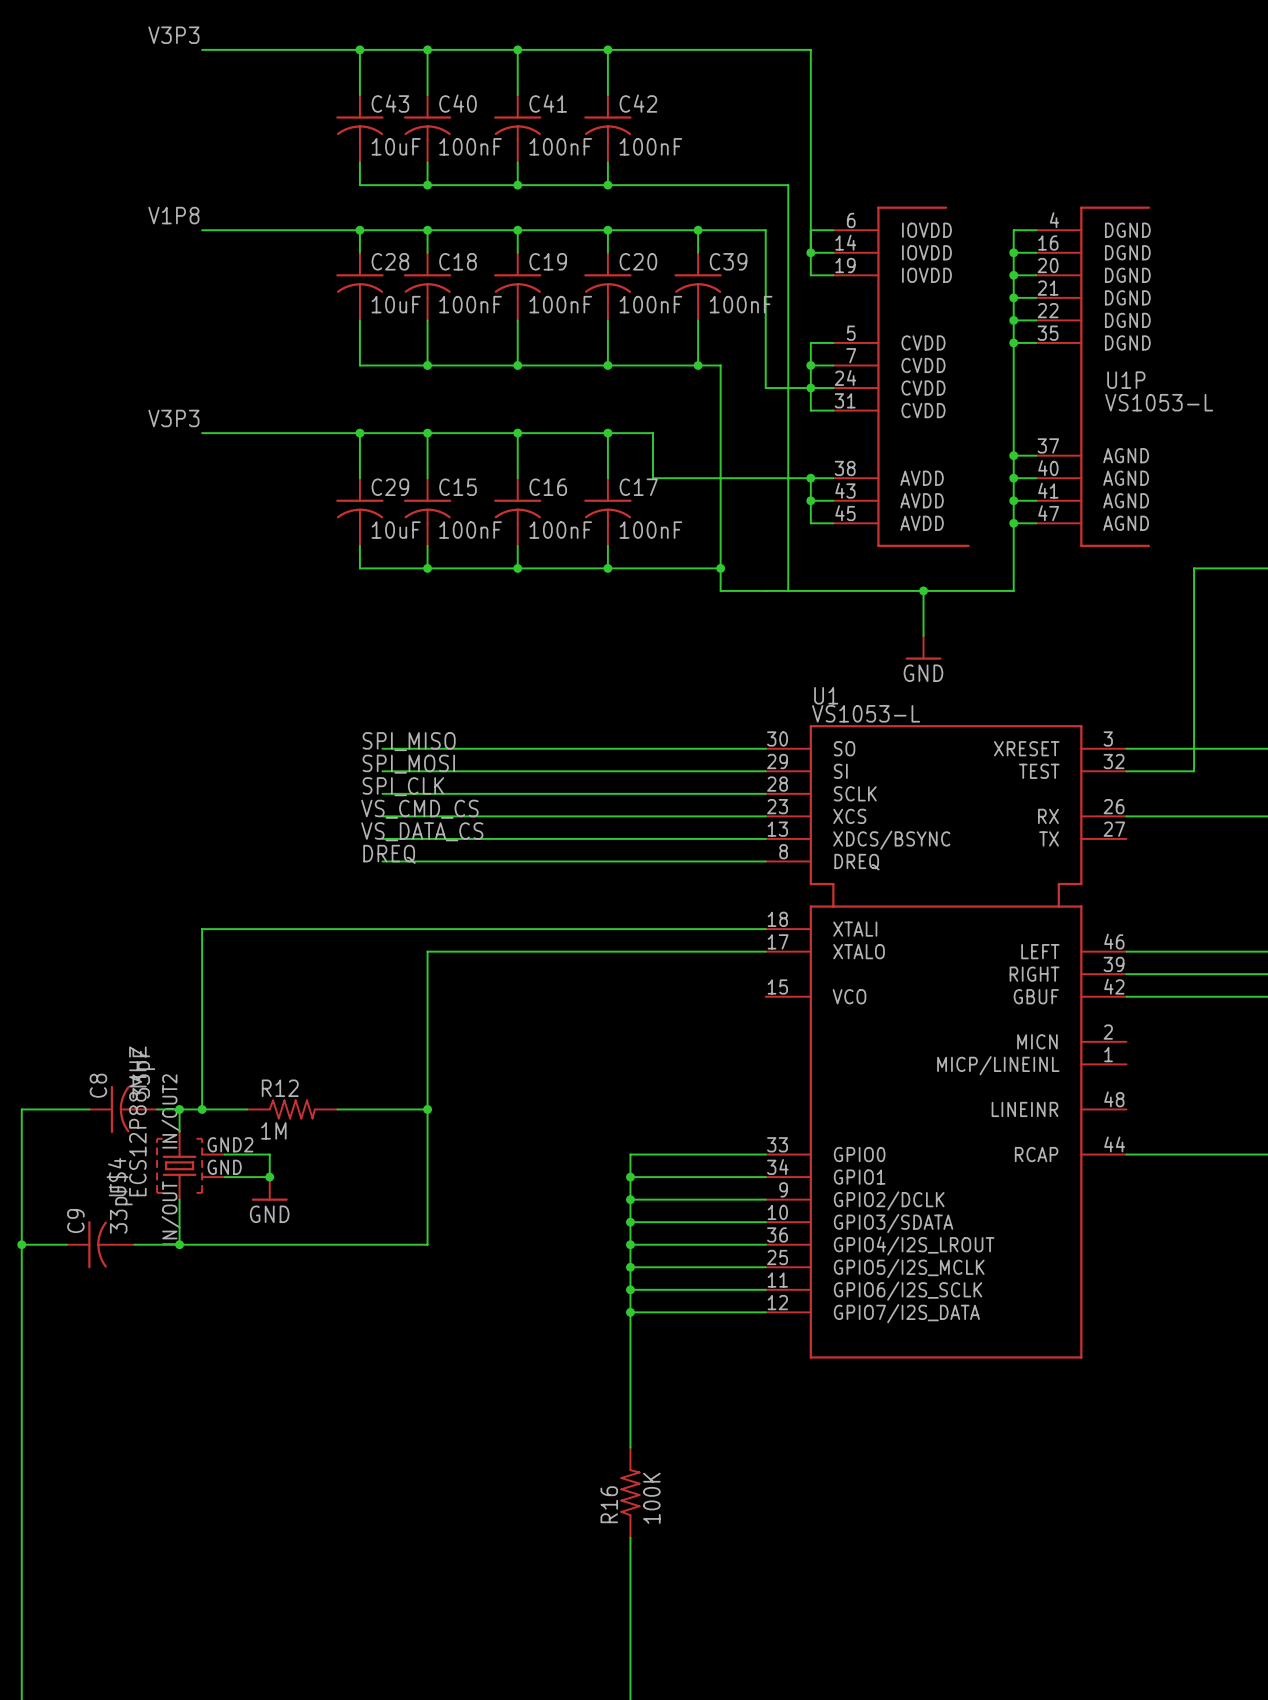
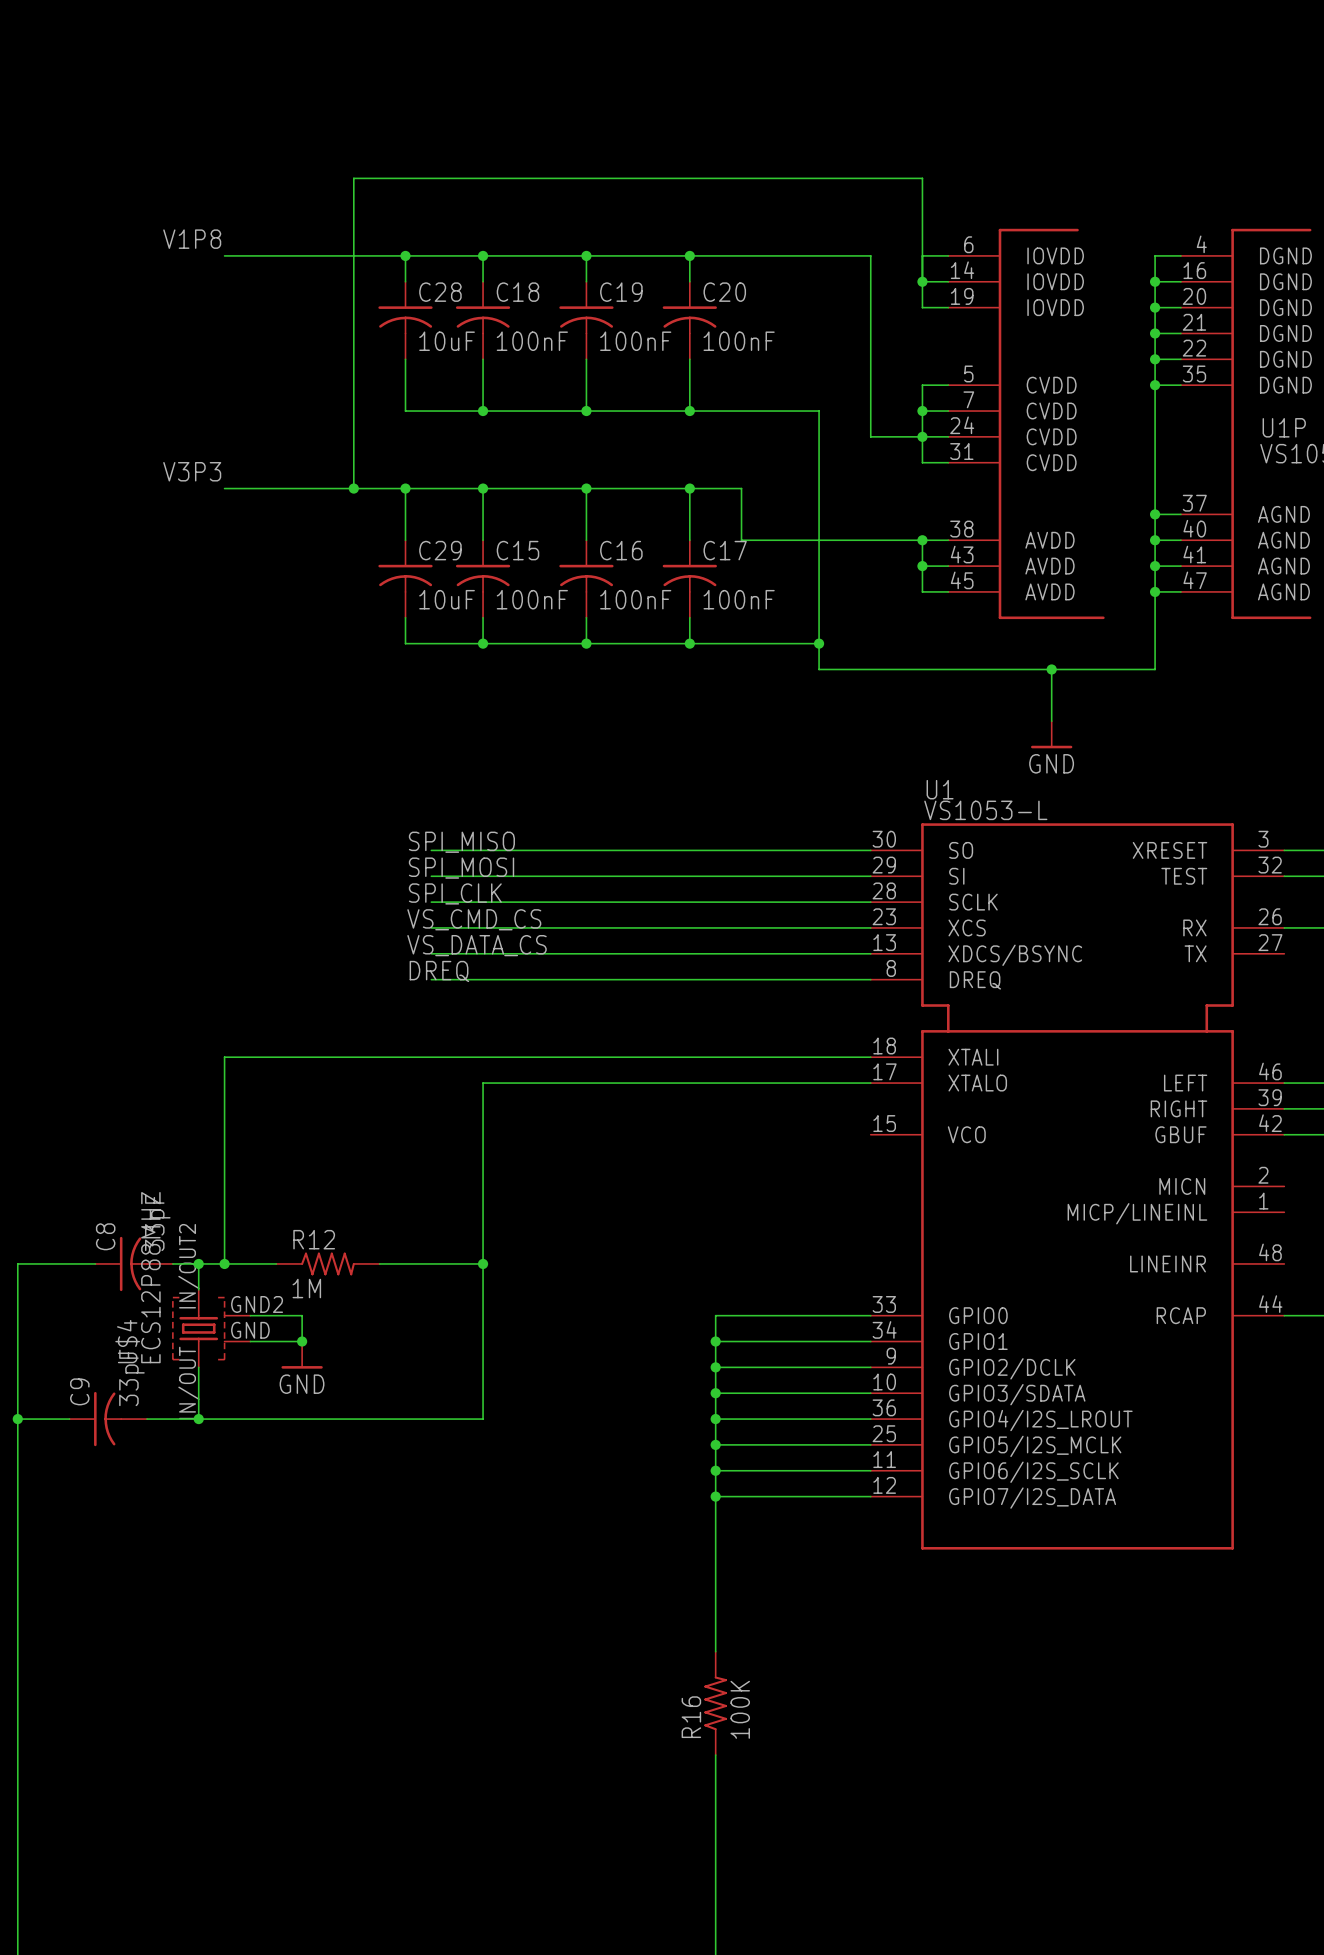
label: V3P3 (173, 35) -> none
wire: (202, 49) (810, 49) (810, 162) -> (353, 488) (353, 178) (922, 178)
wire: (359, 49) (359, 94) -> none
junction: (359, 49) -> none
wire: (427, 49) (427, 94) -> none
junction: (427, 49) -> none
wire: (517, 49) (517, 94) -> none
junction: (517, 49) -> none
wire: (607, 49) (607, 94) -> none
junction: (607, 49) -> none
C43: 10uF (359, 128) -> none
C40: 100nF (427, 128) -> none
C41: 100nF (517, 128) -> none
C42: 100nF (607, 128) -> none
wire: (359, 162) (359, 185) (788, 185) (788, 590) -> none
wire: (427, 162) (427, 185) -> none
wire: (517, 162) (517, 185) -> none
wire: (607, 162) (607, 185) -> none
junction: (427, 185) -> none
junction: (517, 185) -> none
junction: (607, 185) -> none
wire: (698, 230) (698, 252) -> none
junction: (698, 230) -> none
C39: 100nF (698, 286) -> none
wire: (698, 320) (698, 365) -> none
junction: (698, 365) -> none
junction: none -> (353, 488)

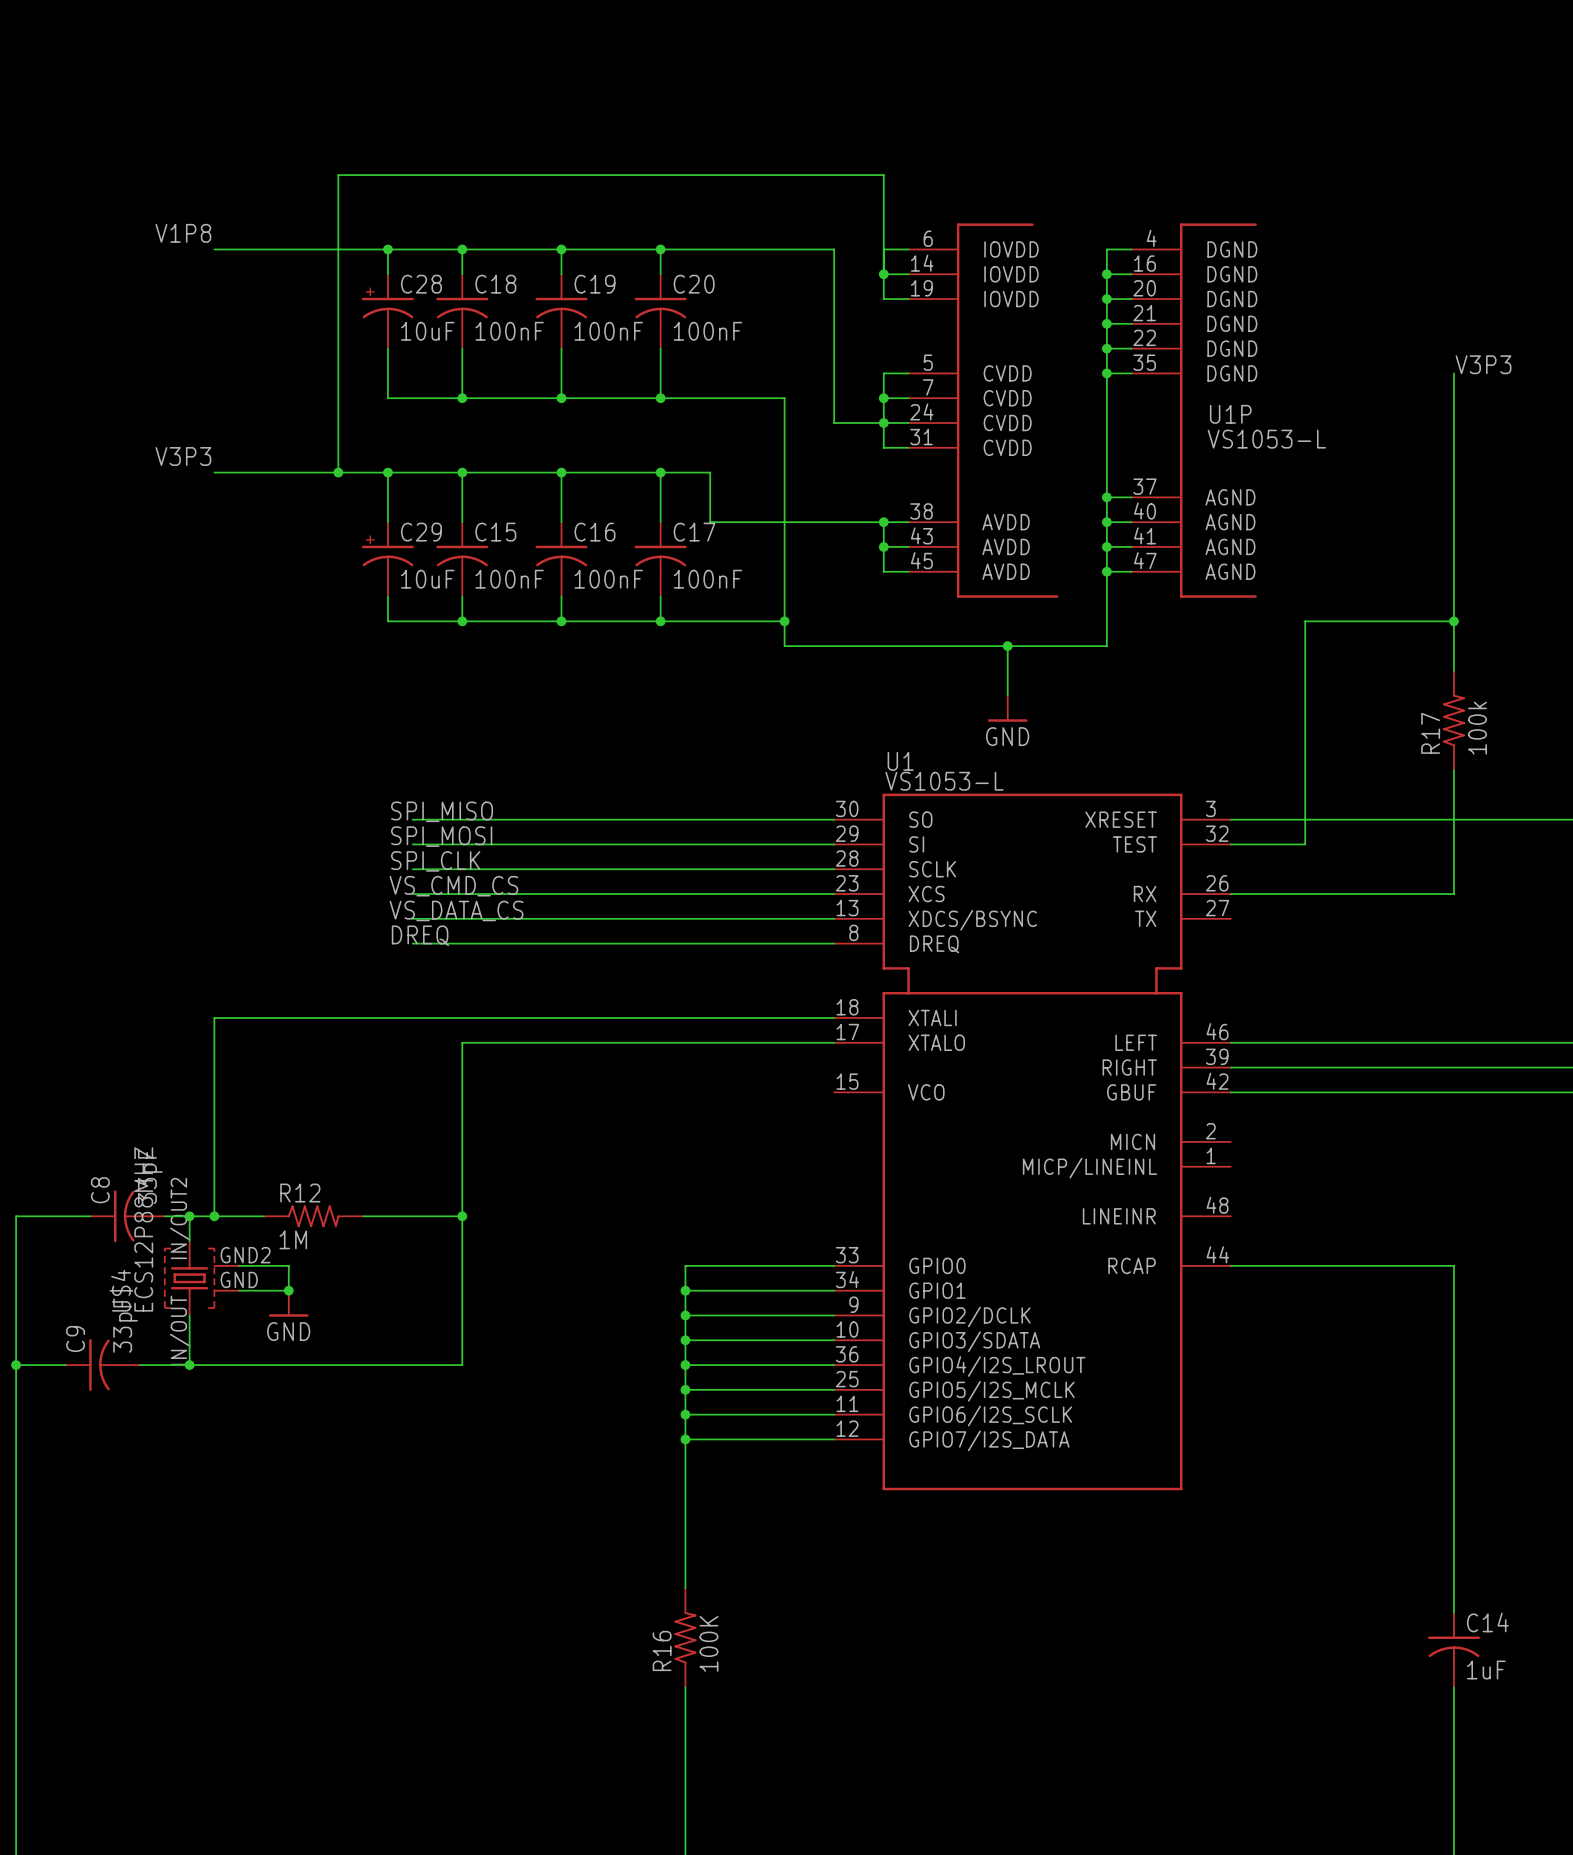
C28 symbol: [378, 281, 433, 360] -> [361, 274, 414, 349]
C29 symbol: [378, 540, 433, 618] -> [361, 522, 414, 597]

